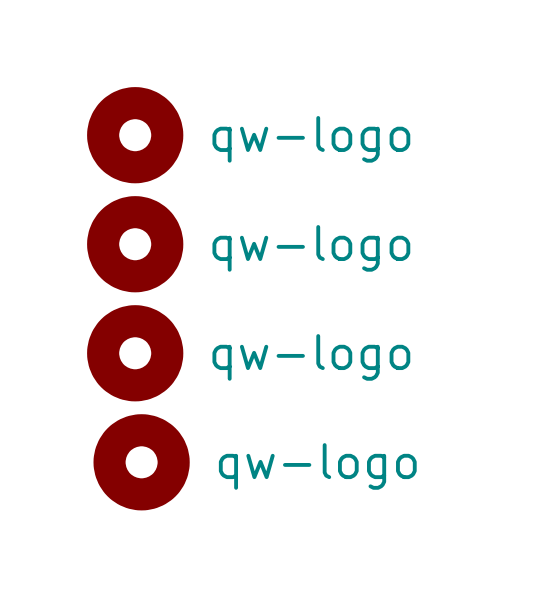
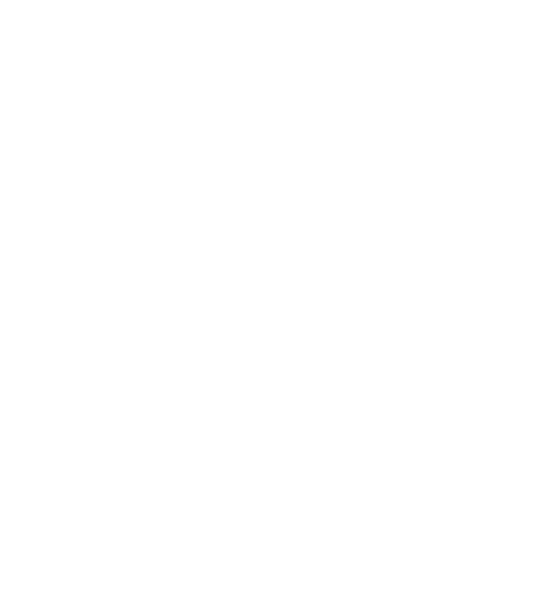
part: qw-logo (135, 135) -> none
part: qw-logo (135, 244) -> none
part: qw-logo (135, 353) -> none
part: qw-logo (141, 462) -> none

